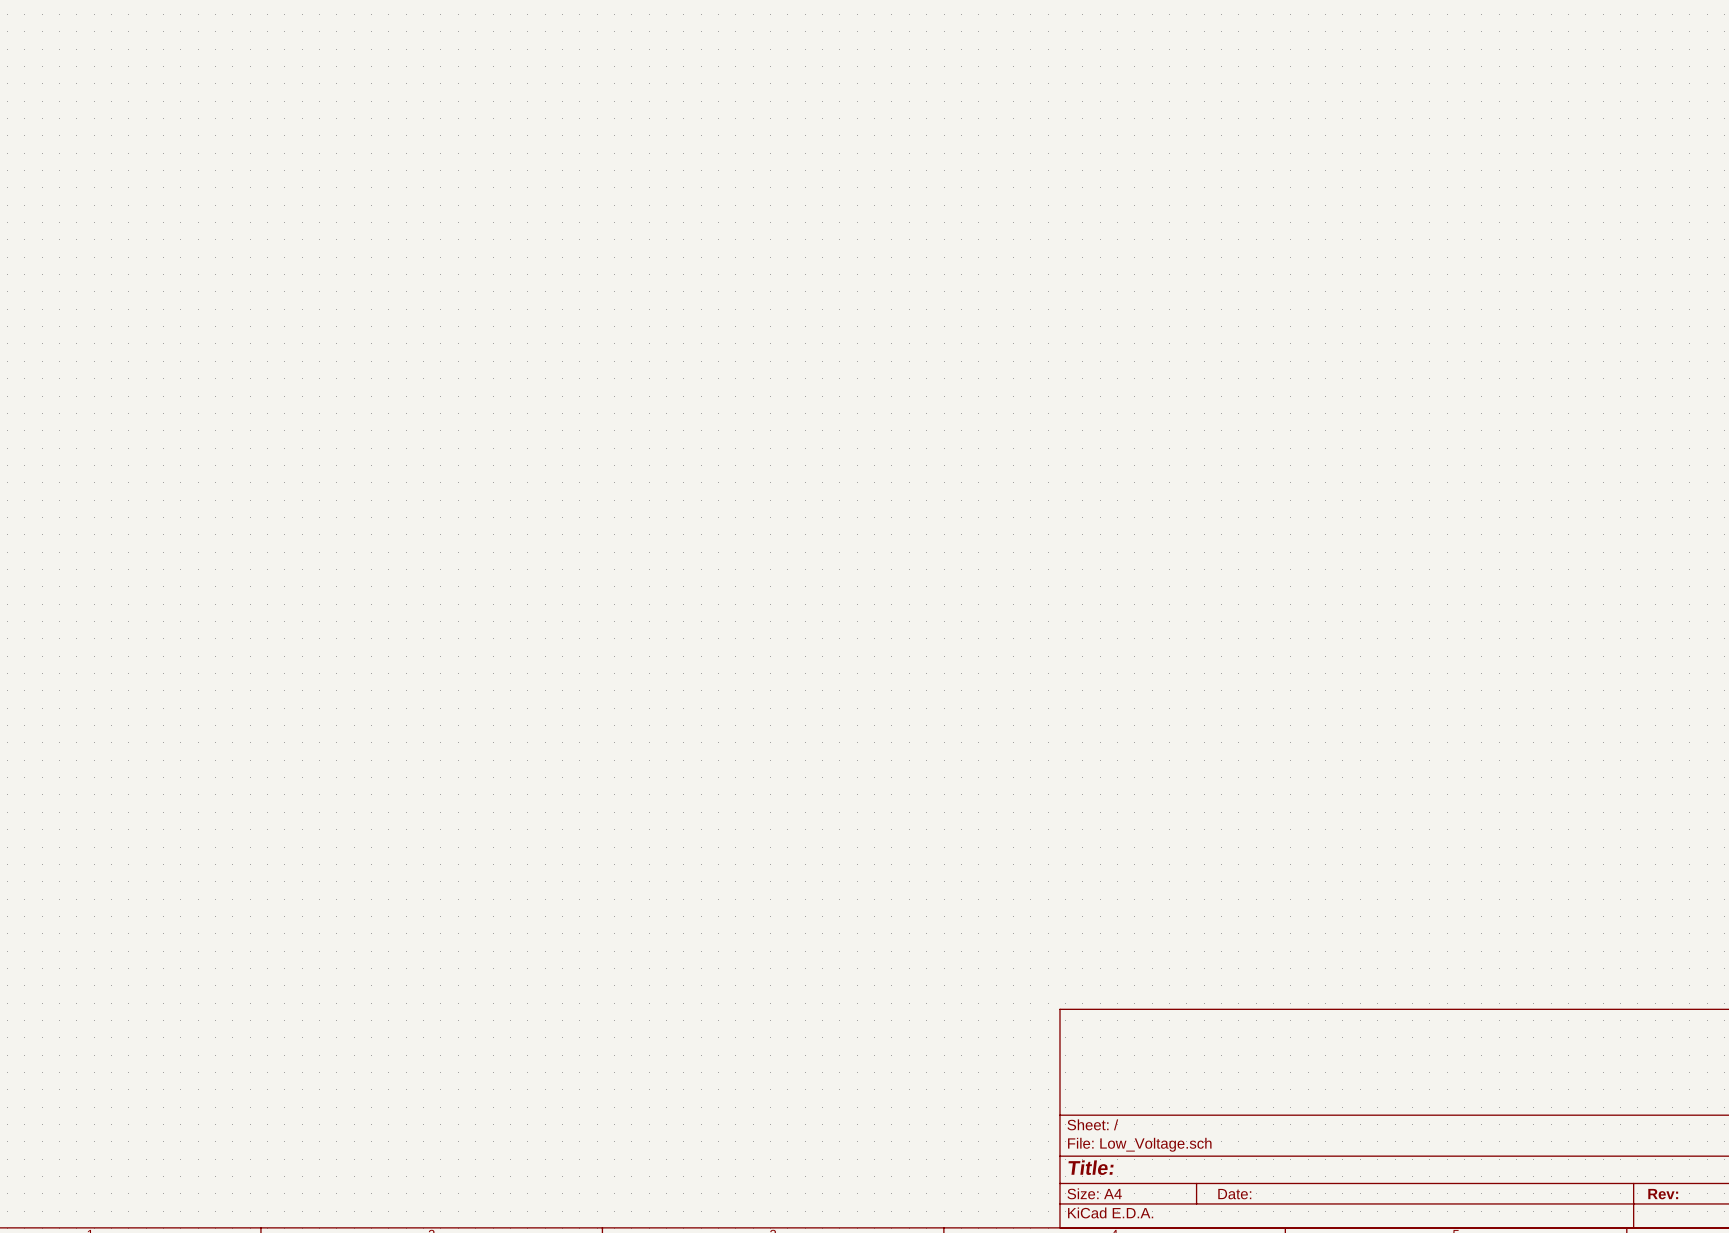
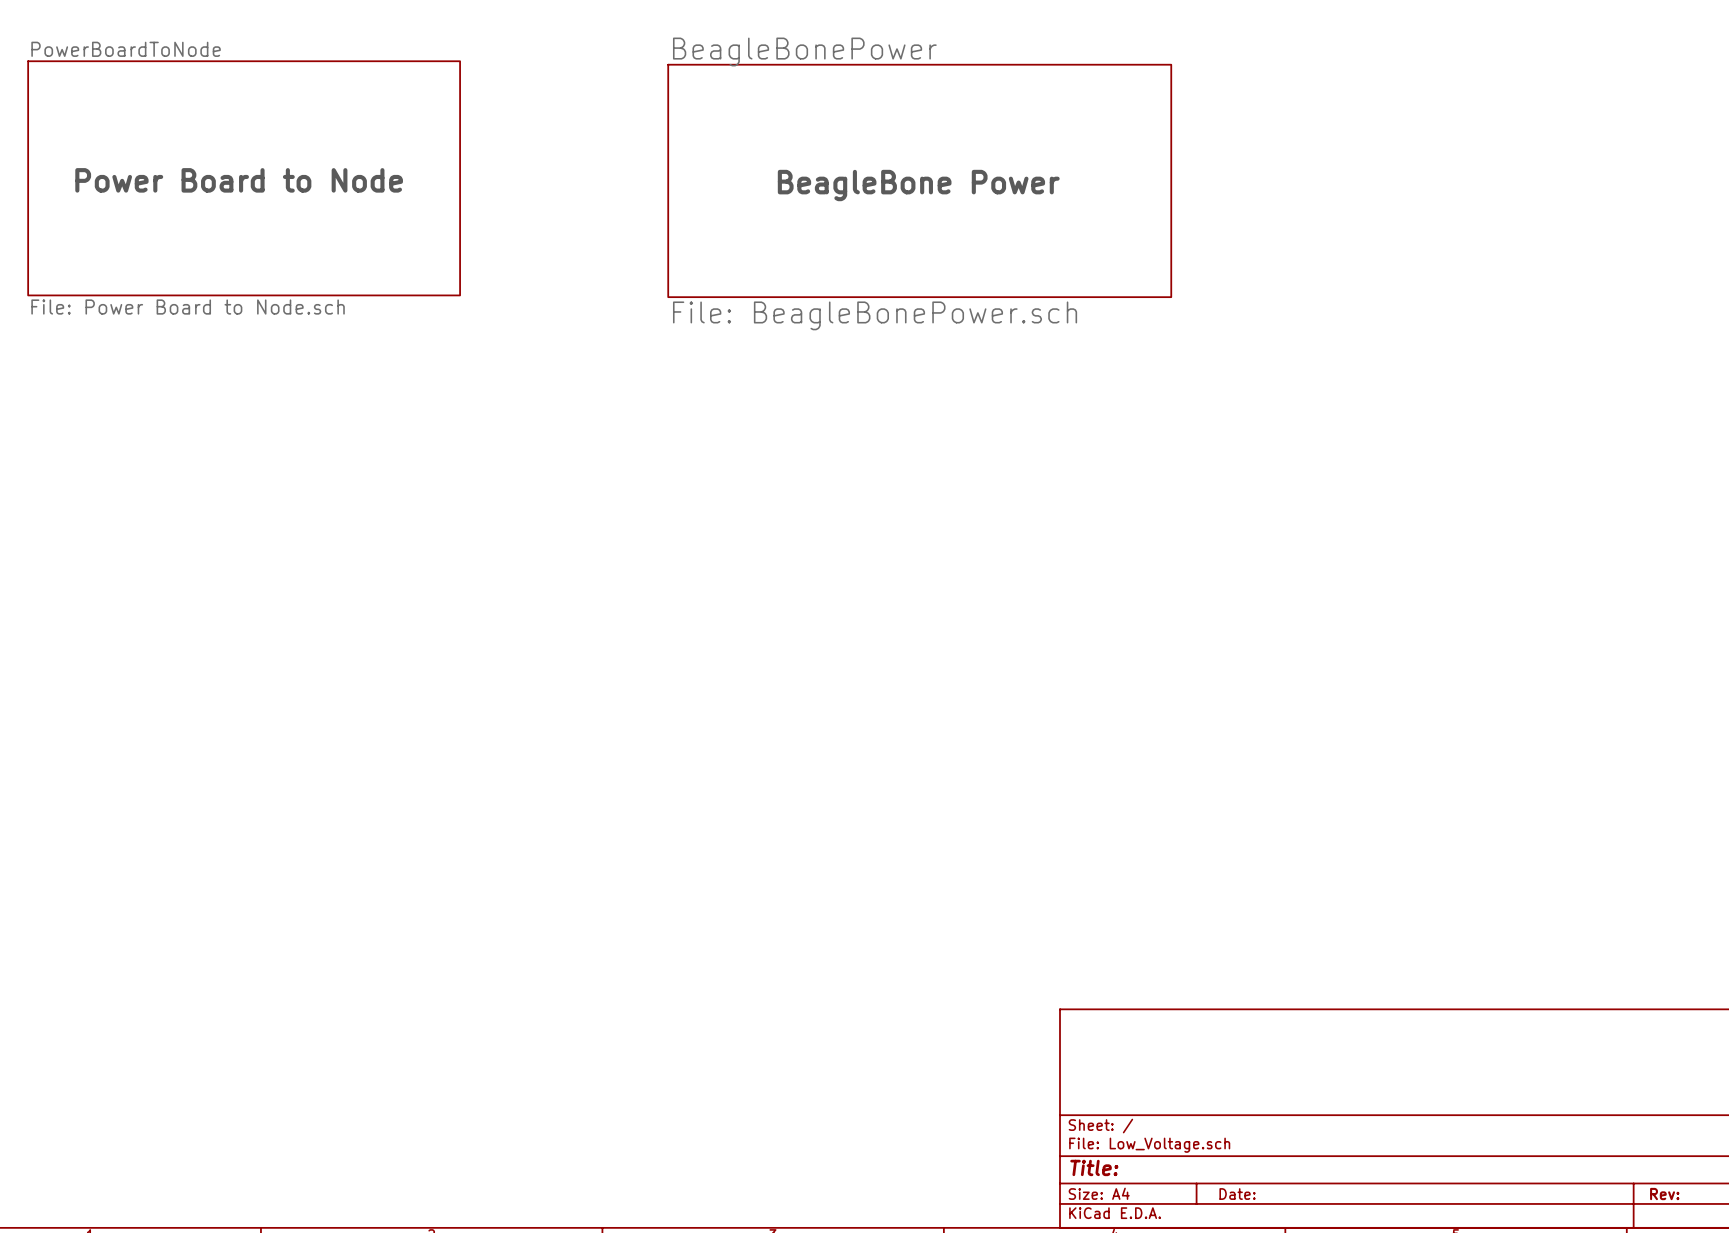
sheet PowerBoardToNode: none -> File: Power Board to Node.sch (244, 178)
text: none -> Power Board to Node (239, 180)
sheet BeagleBonePower: none -> File: BeagleBonePower.sch (919, 180)
text: none -> BeagleBone Power (918, 185)

